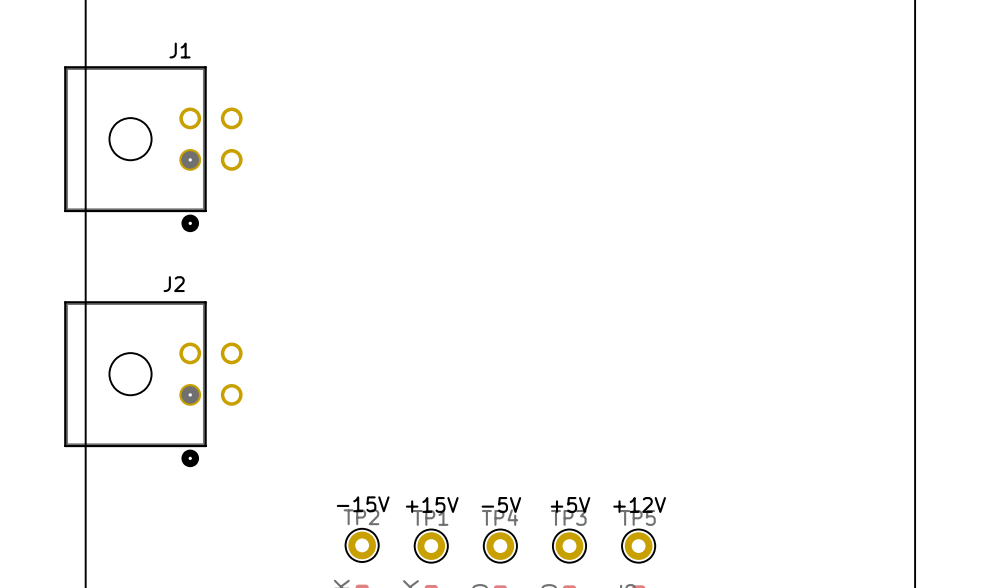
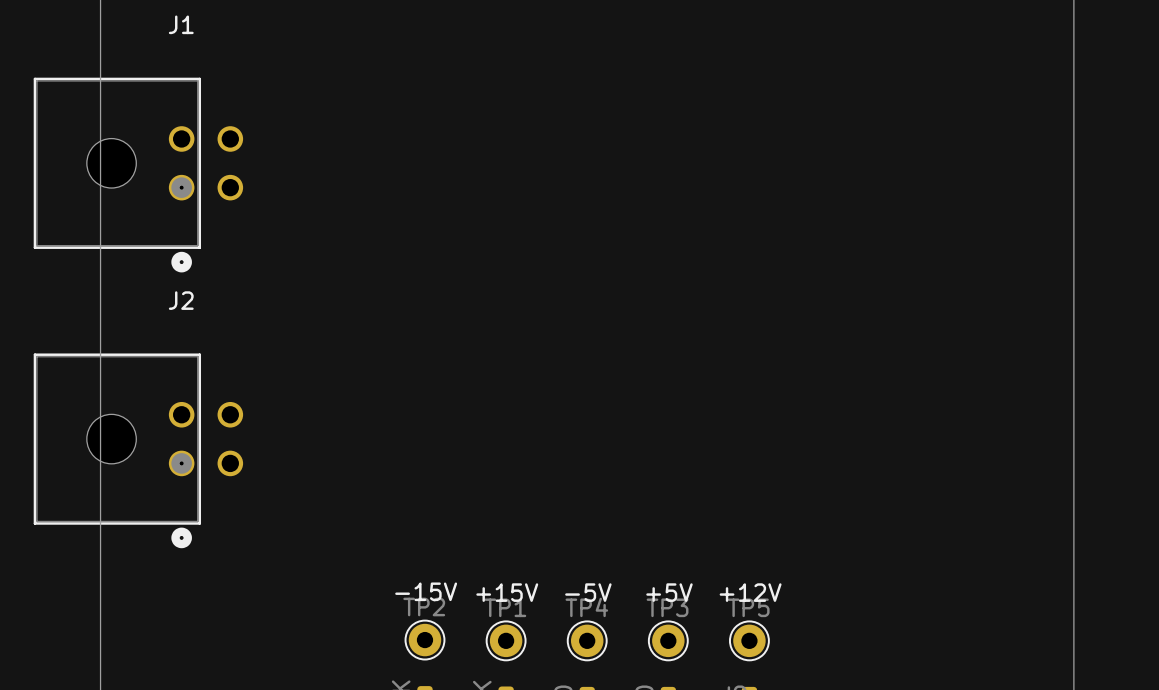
J1 name position: J1 (180, 50) -> J1 (181, 24)
J1 position: (153, 149) -> (138, 175)
J2 name position: J2 (174, 284) -> J2 (181, 300)
J2 position: (153, 384) -> (138, 450)

